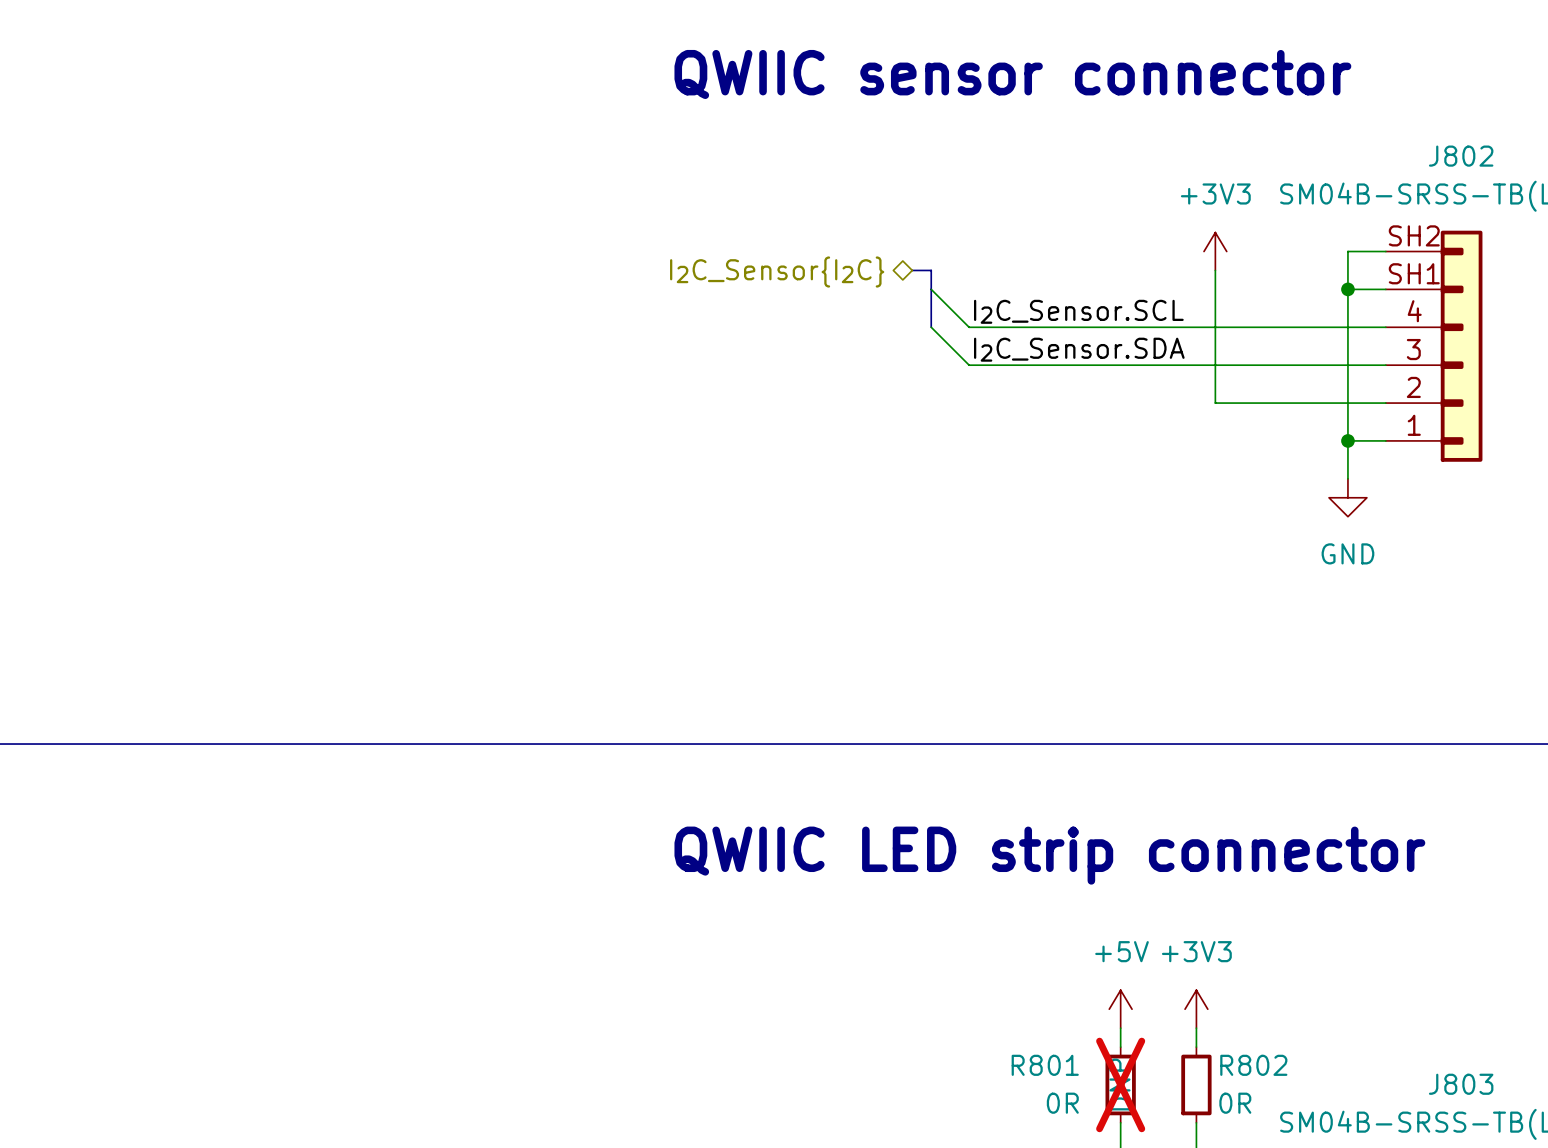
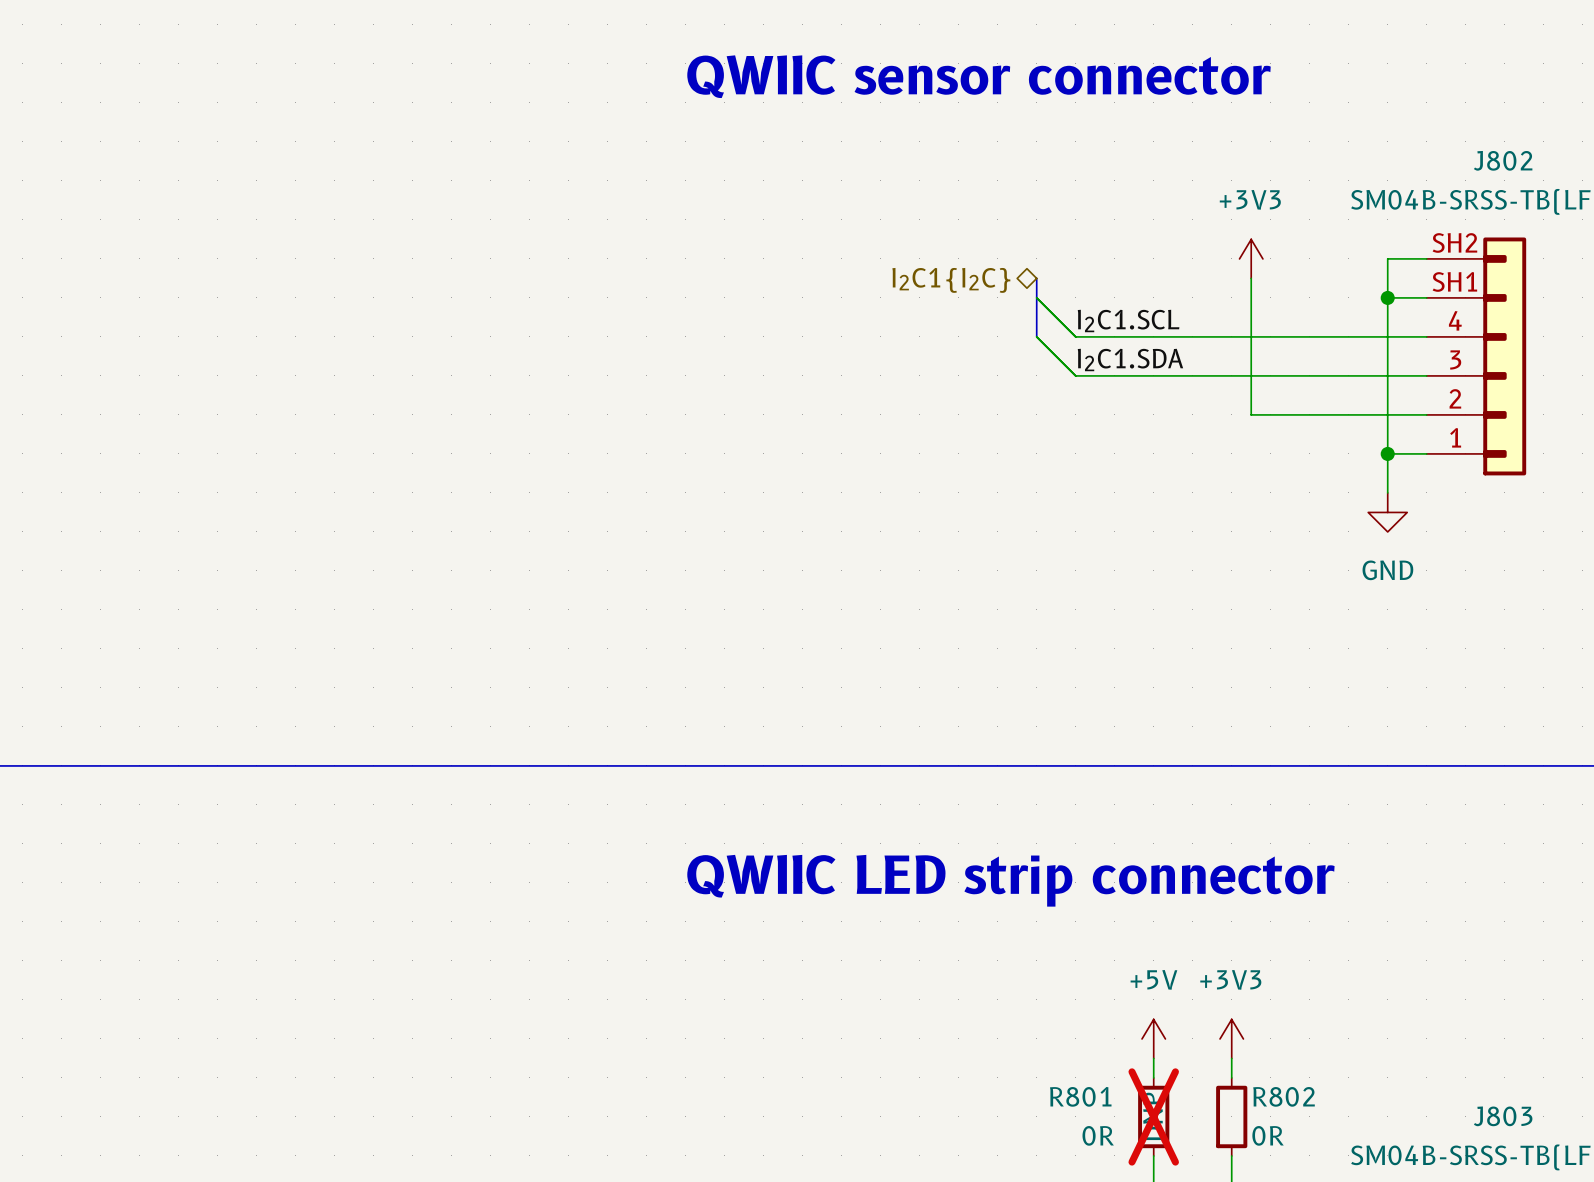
bus: (912, 270) (931, 270) (931, 327) -> none
bus: none -> (1036, 278) (1036, 336)
hierarchical label: I2C_Sensor{I2C} (777, 272) -> I2C1{I2C} (951, 280)
wire: (931, 289) (969, 327) (1044, 327) -> (1036, 297) (1075, 336)
label: I2C_Sensor.SCL (1078, 311) -> I2C1.SCL (1128, 321)
wire: (931, 327) (969, 365) (1044, 365) -> (1036, 336) (1075, 375)
label: I2C_Sensor.SDA (1079, 349) -> I2C1.SDA (1130, 360)

